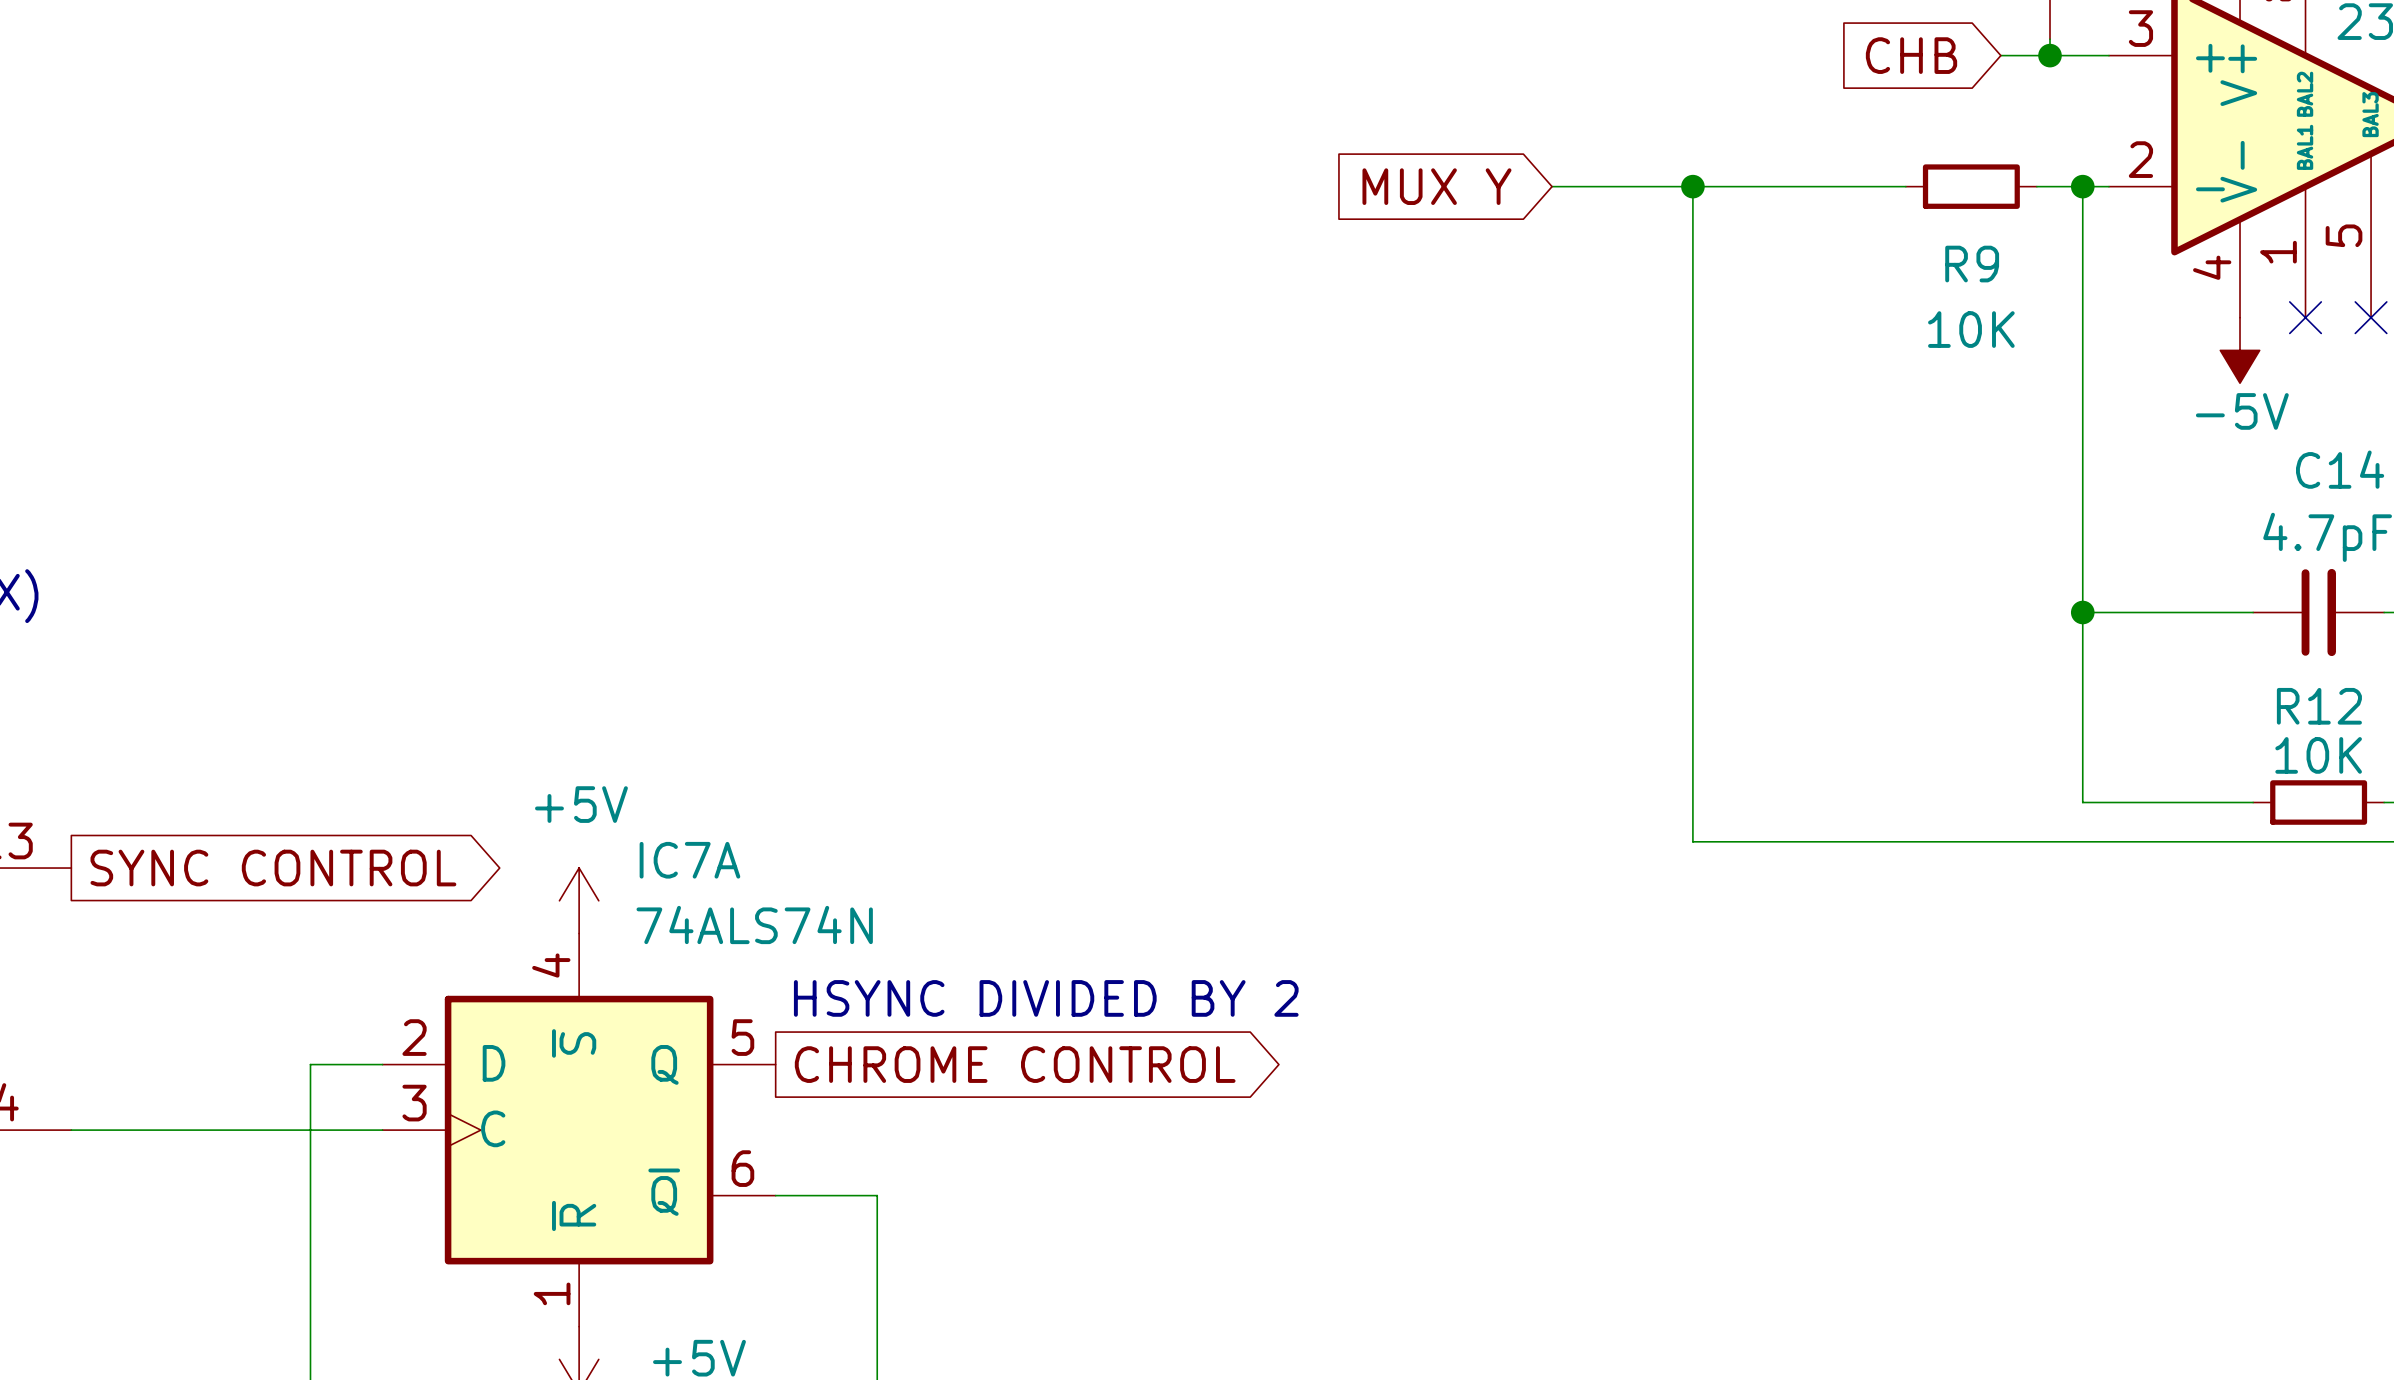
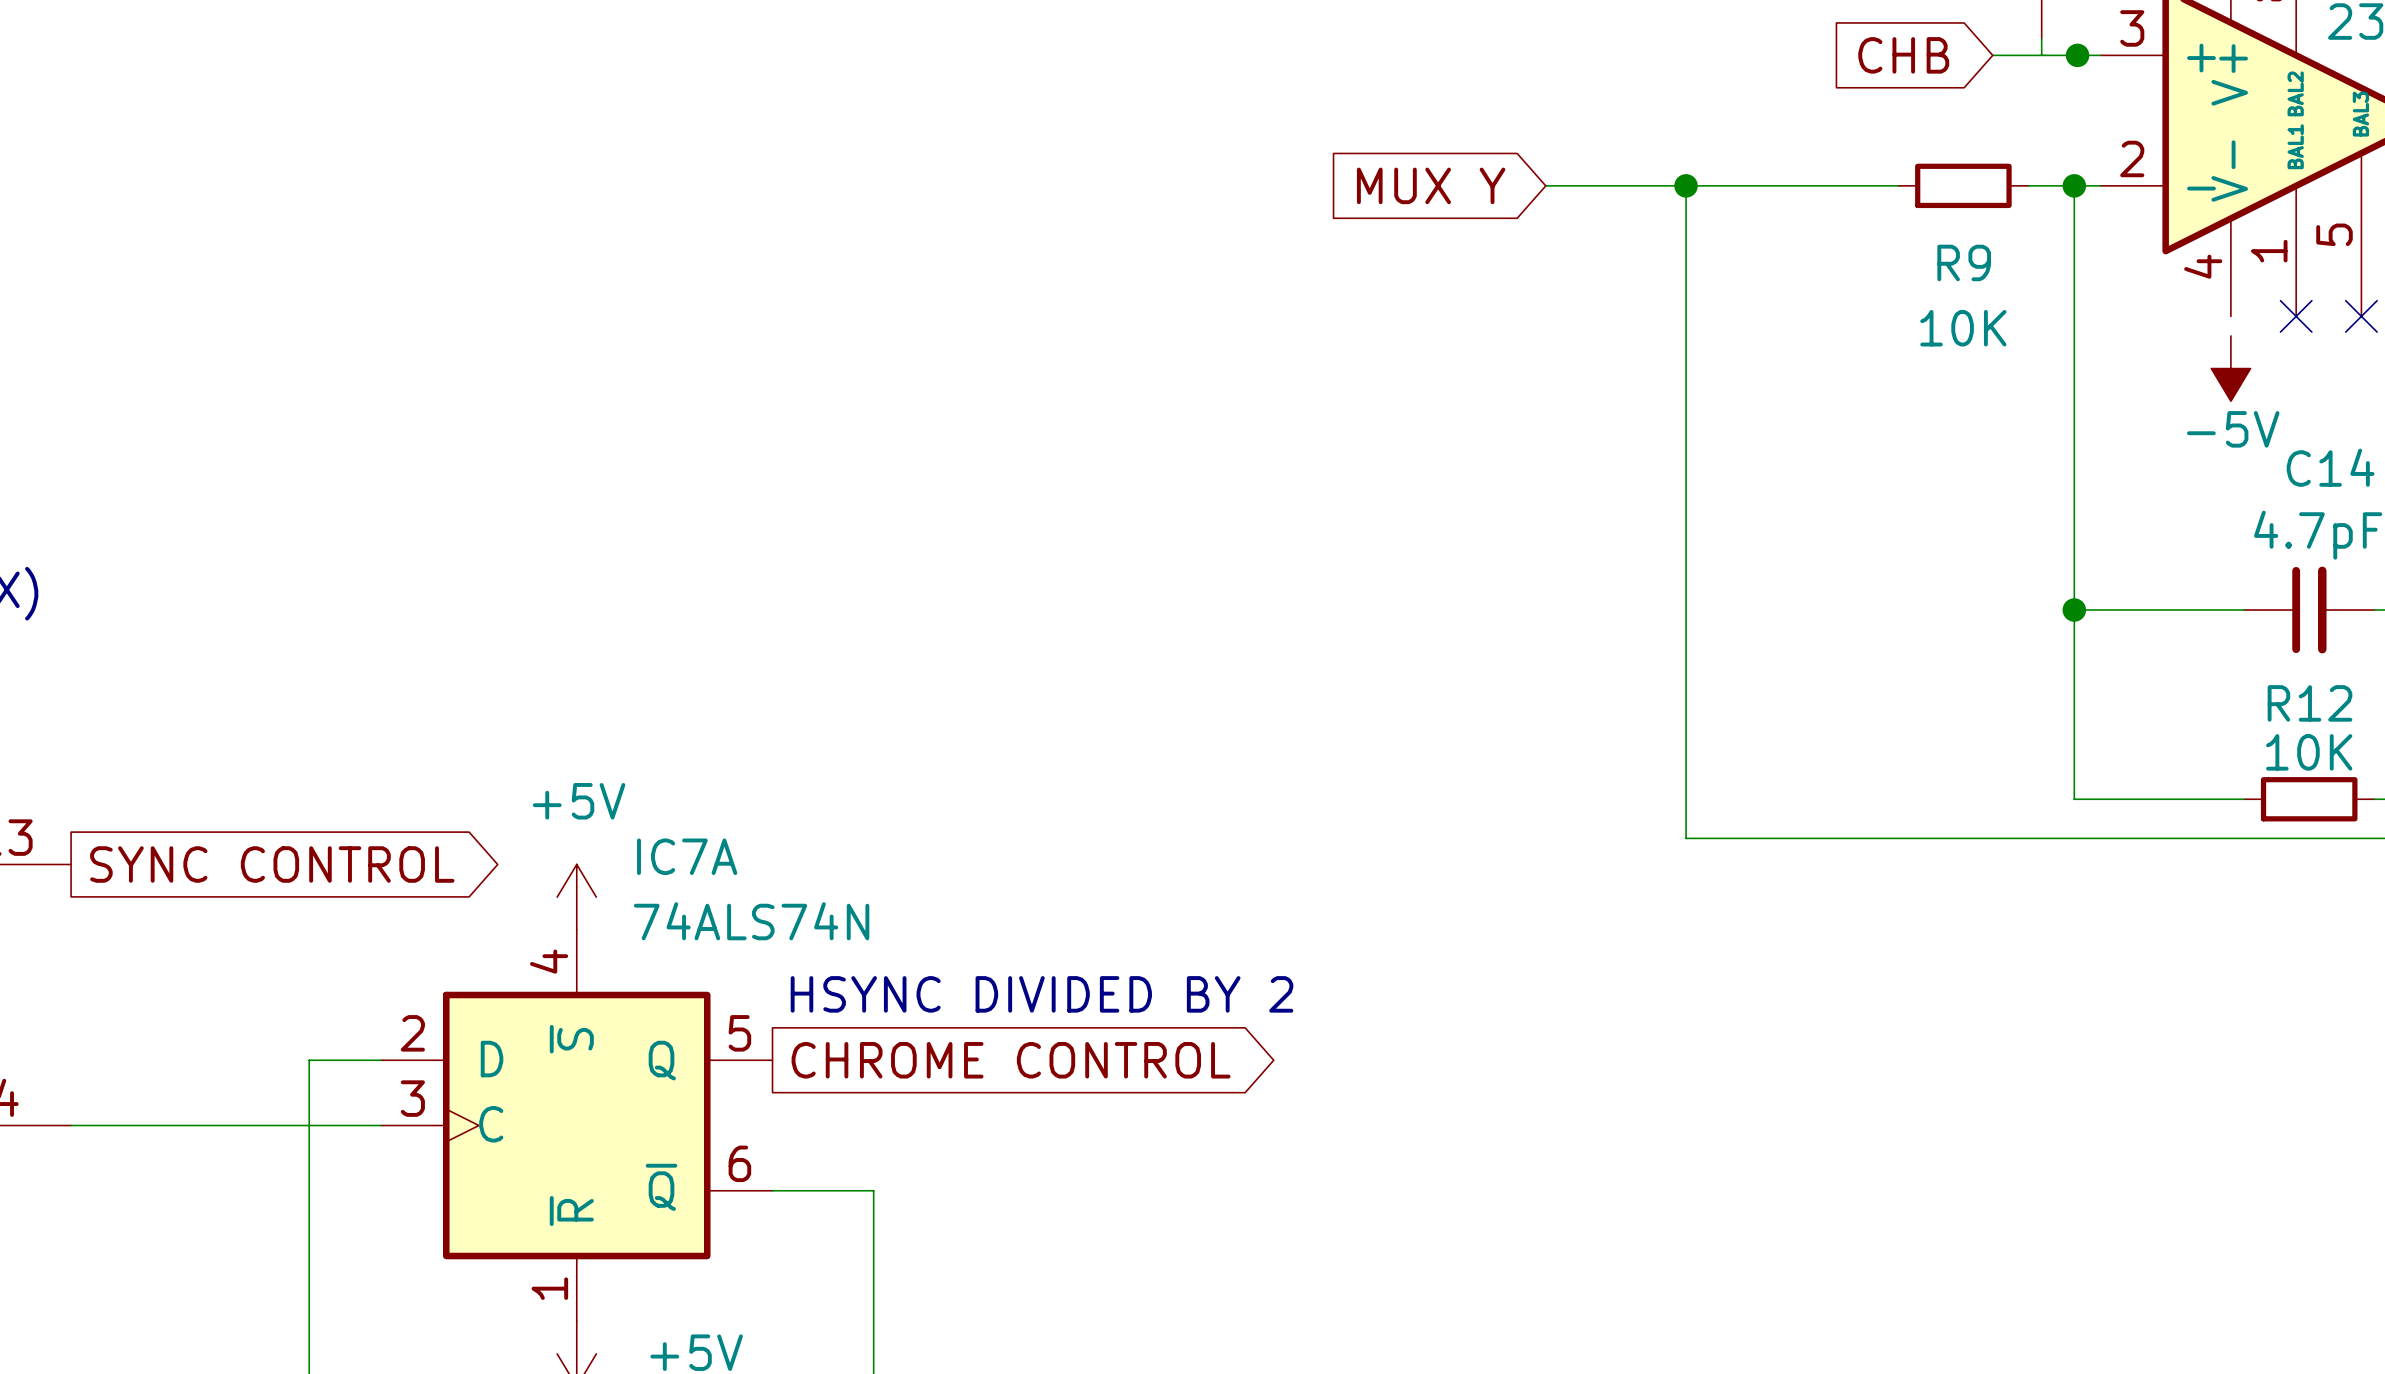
junction position: (2050, 55) -> (2077, 55)
power symbol position: -5V (2240, 350) -> -5V (2230, 368)

